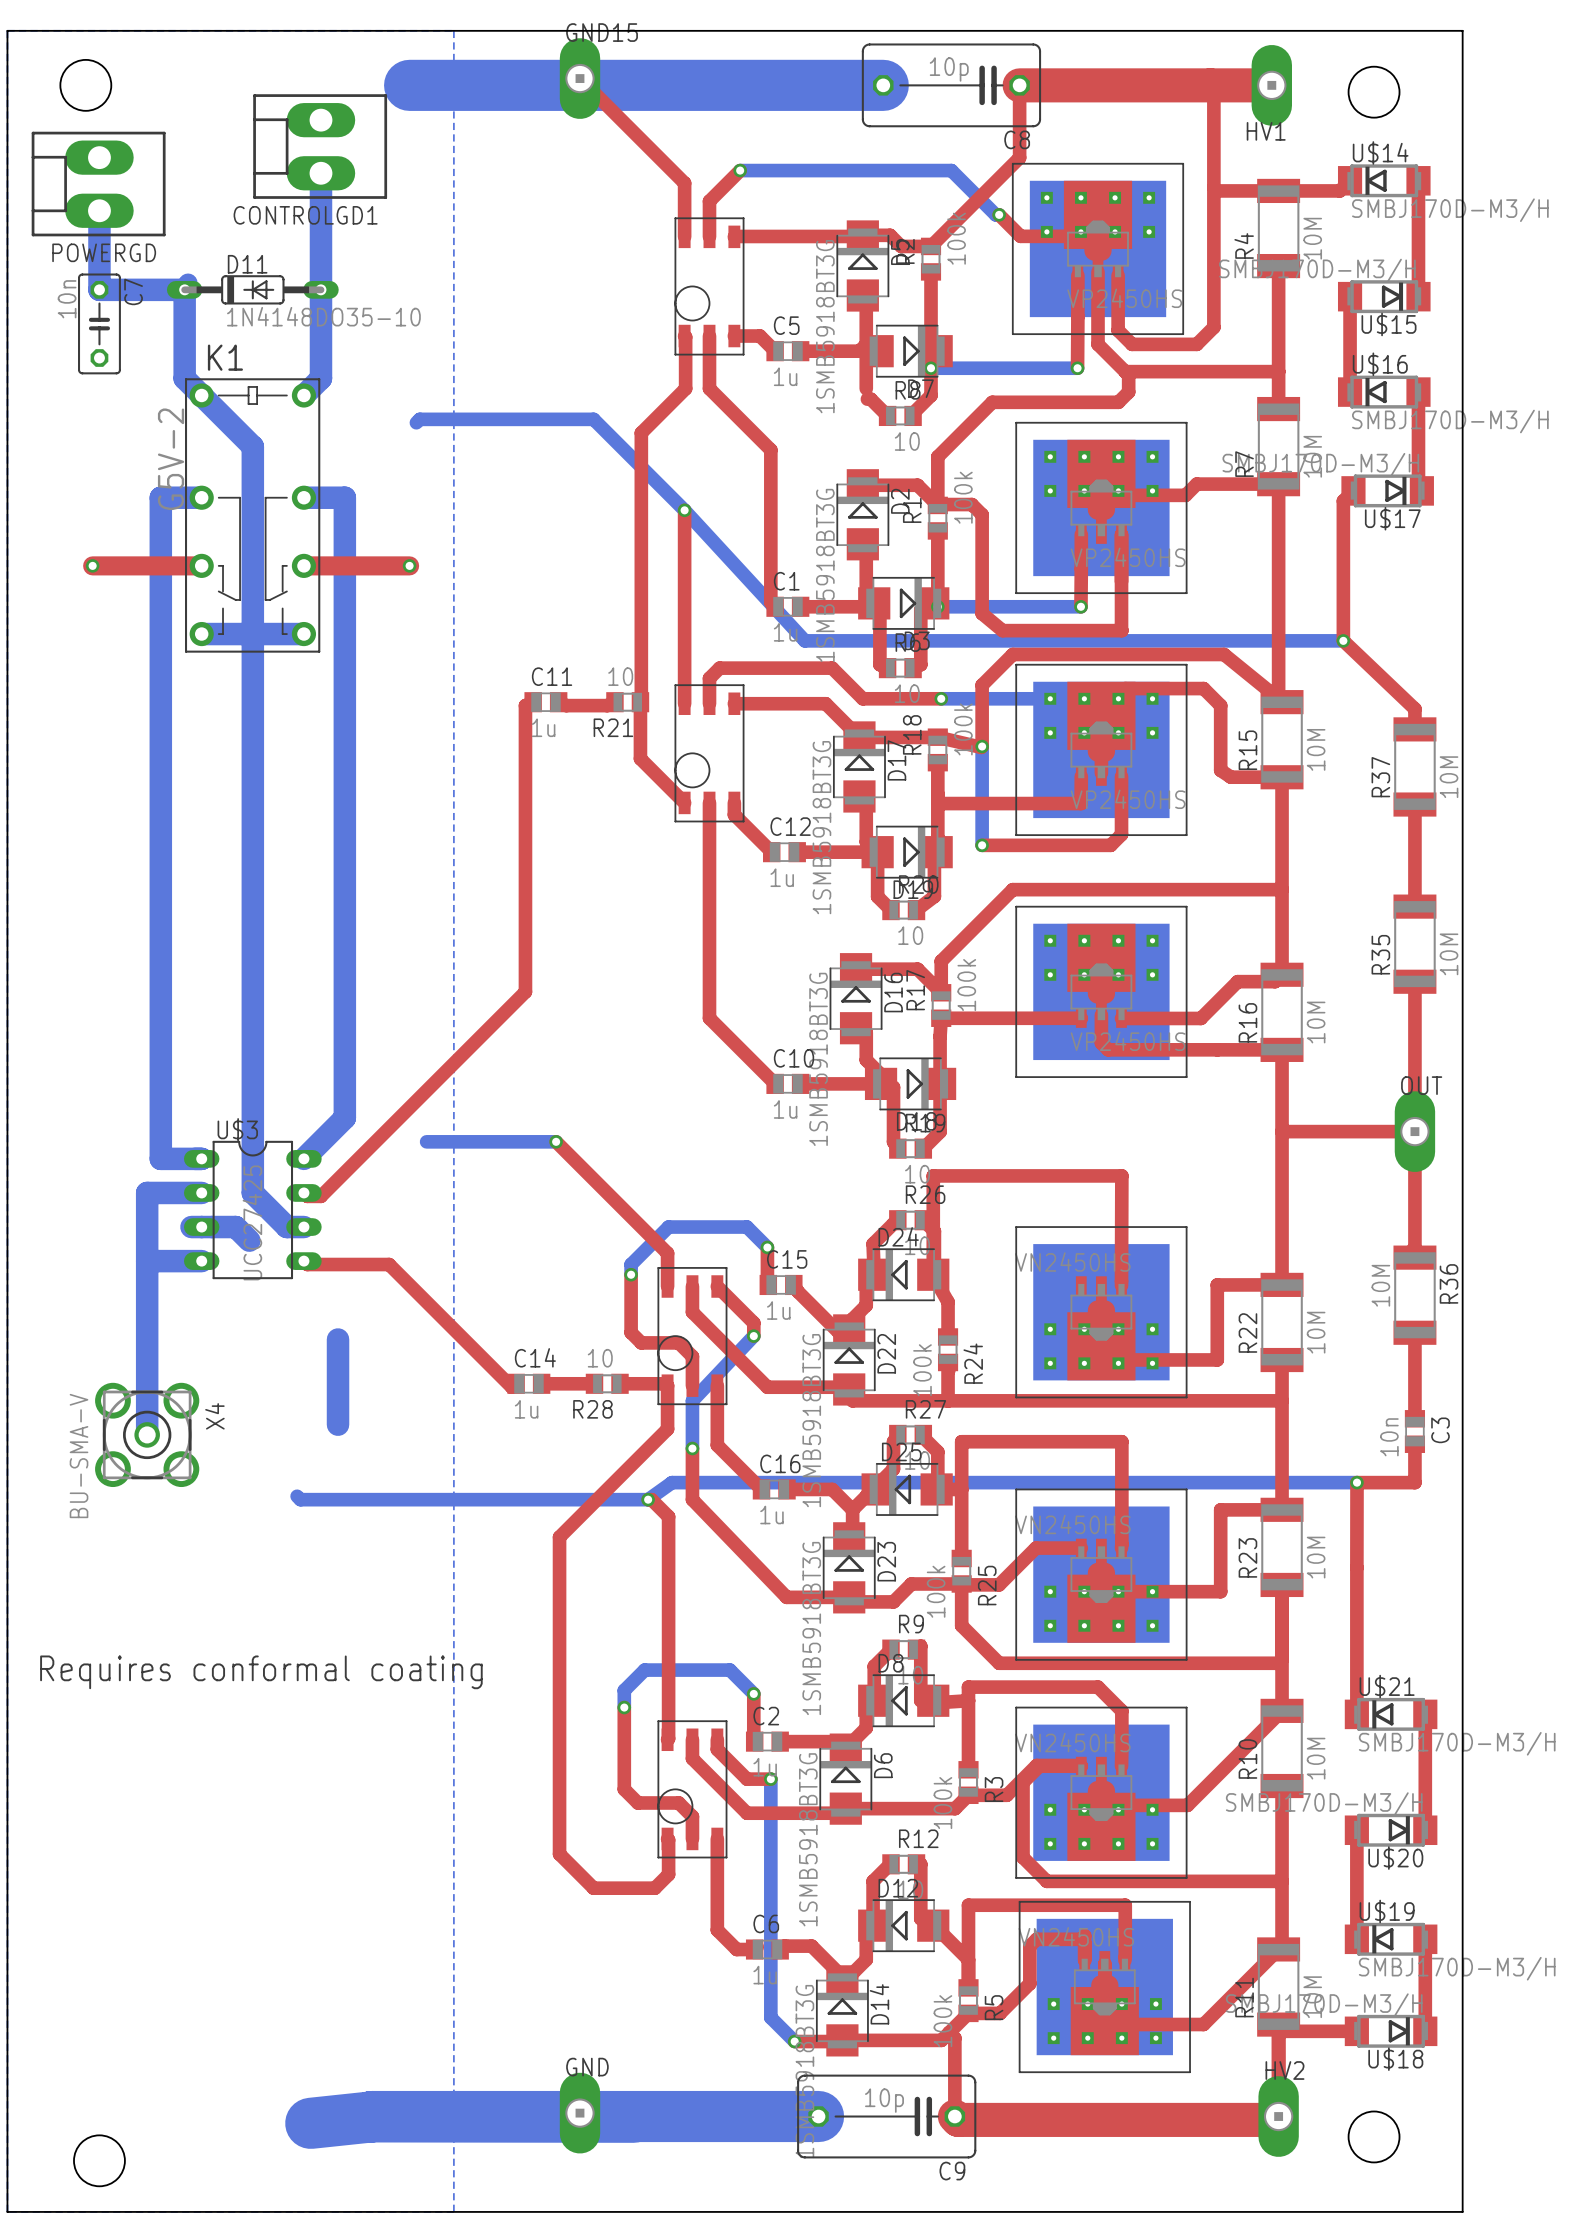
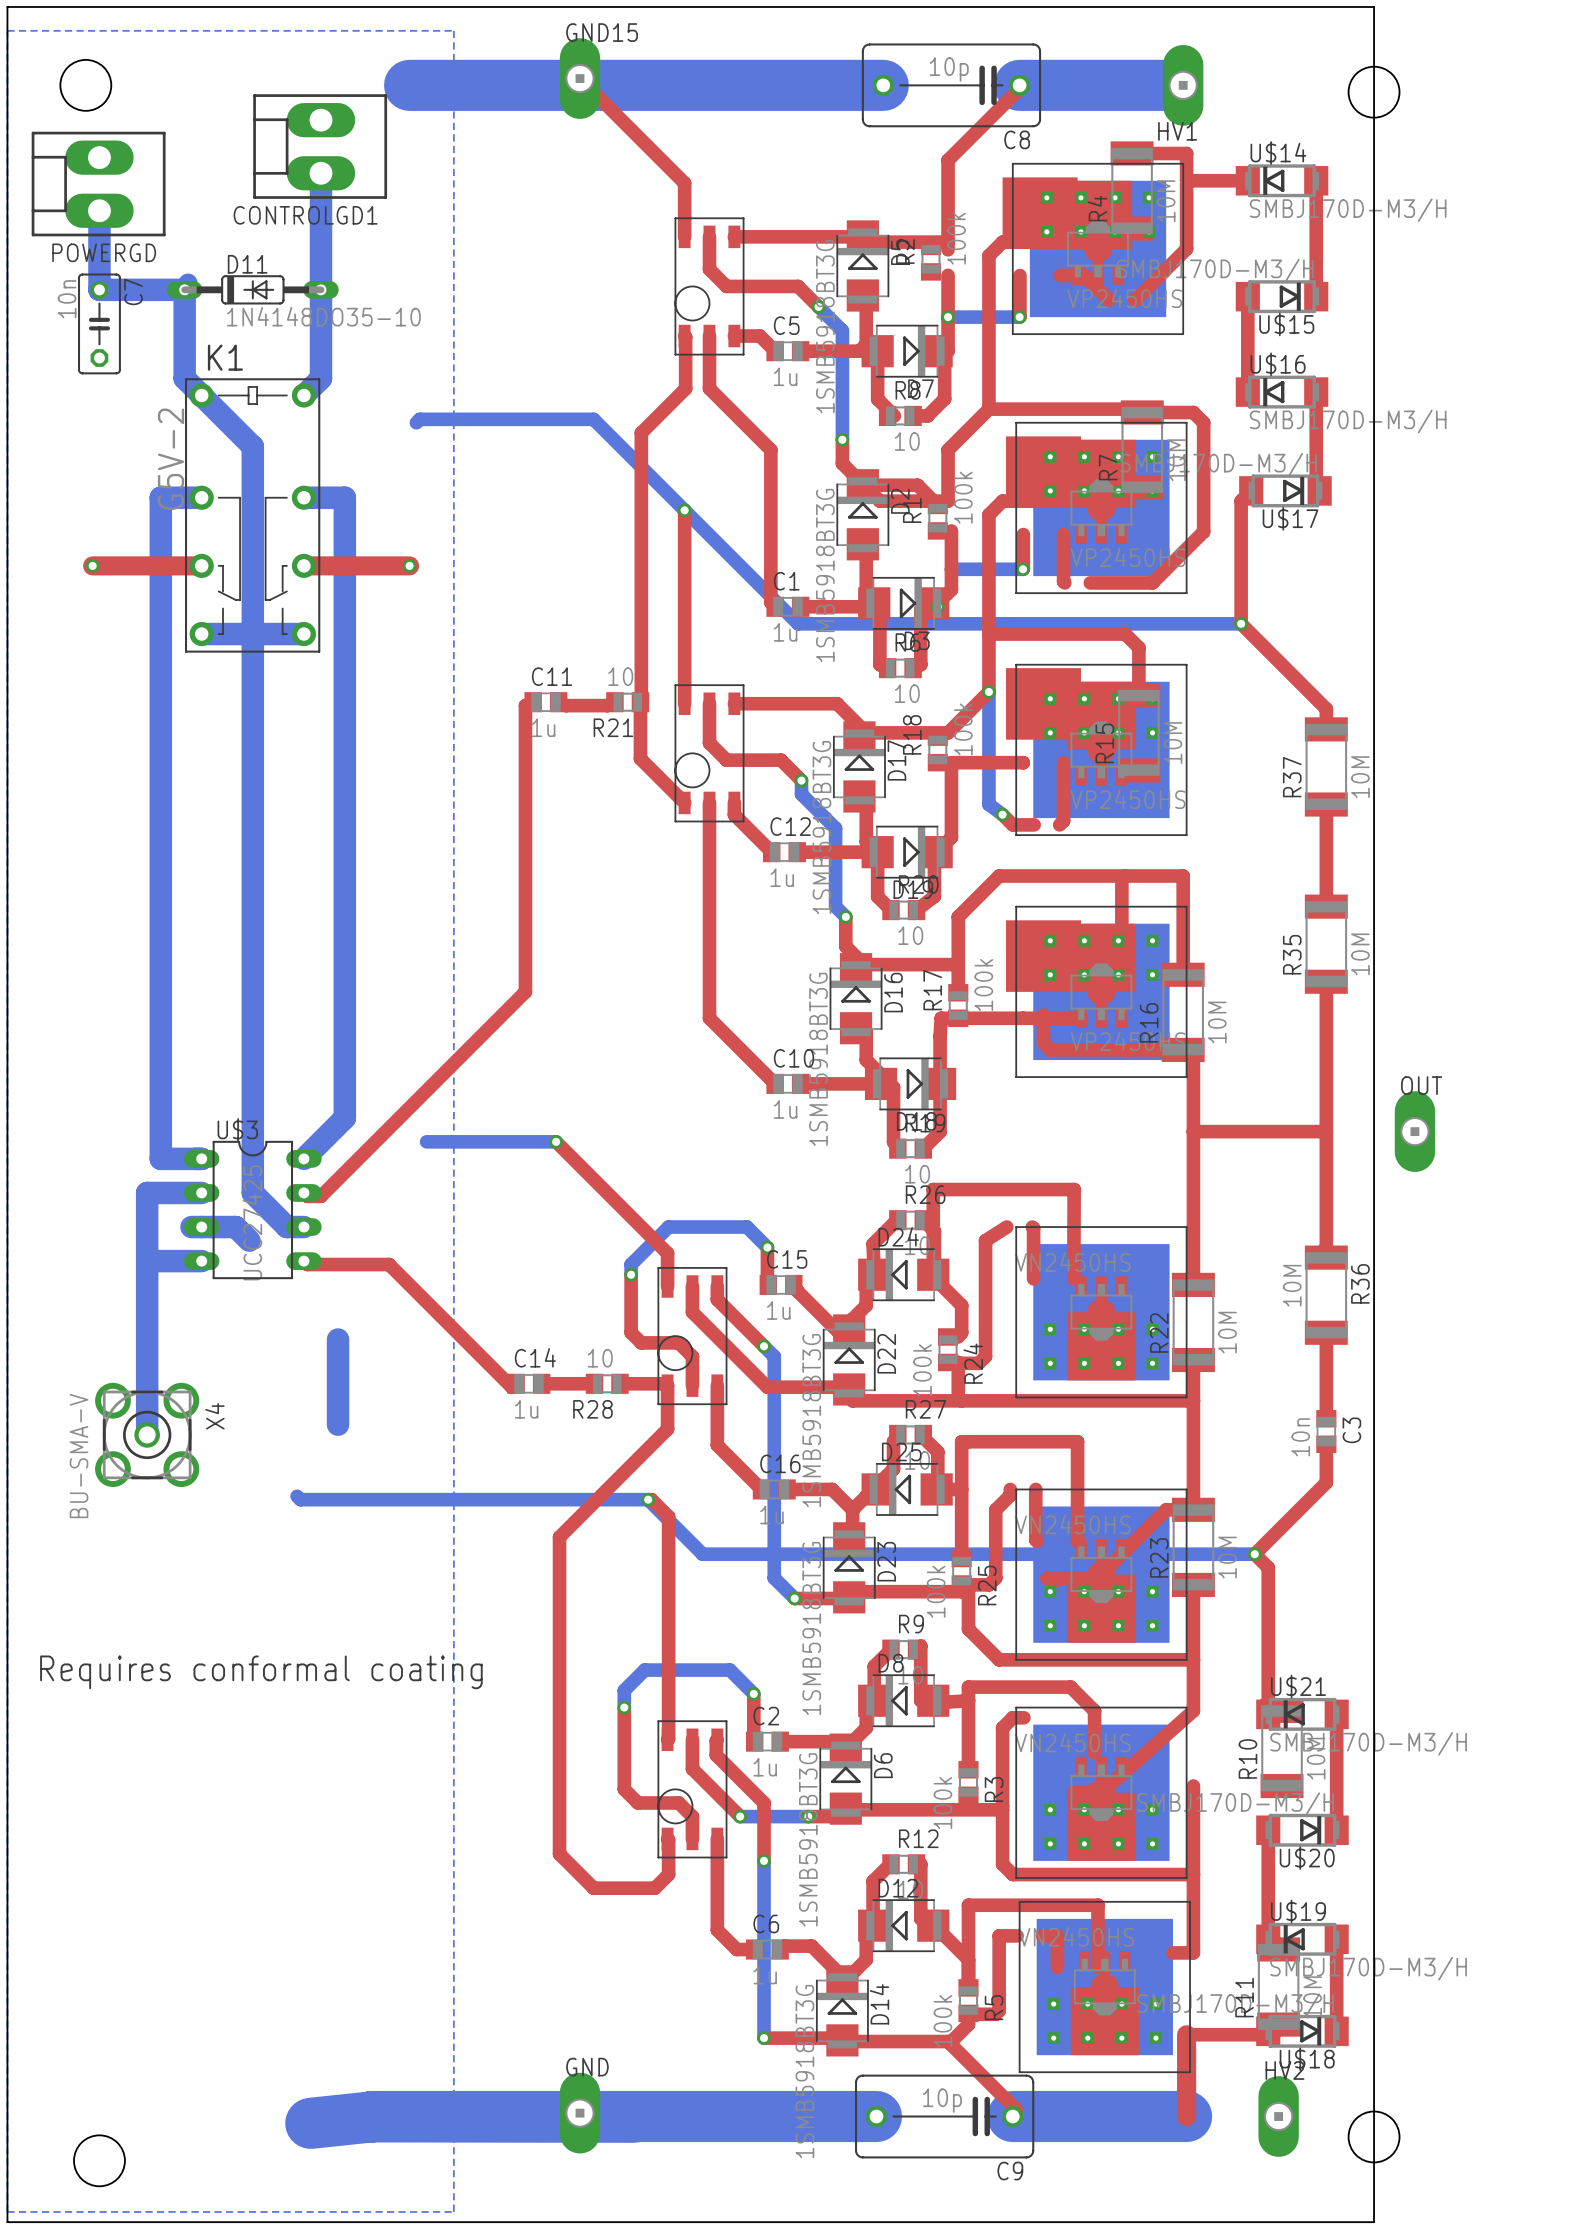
board edge: (7, 30) (1462, 30) (1462, 2211) (7, 2211) -> (7, 30) (7, 6) (1374, 6) (1374, 2222) (7, 2222) (7, 2211)
bottom track: none -> (1019, 85) (1176, 85) (1179, 78) (1183, 88)
top track: none -> (1019, 85) (1016, 92) (948, 160) (948, 249)
top track: (1210, 85) (1213, 88) (1213, 327) (1196, 344) (1132, 344) (1118, 330) (1118, 275) -> none
top track: (1271, 85) (1019, 85) (1019, 157) (931, 246) (901, 246) (890, 235) (734, 236) -> (948, 242) (866, 242) (862, 236) (734, 236)
HV1 position: (1271, 85) -> (1183, 85)
top track: none -> (1132, 153) (1186, 153) (1186, 180) (1247, 180)
bottom track: (740, 170) (951, 170) (995, 214) (999, 214) -> none
top track: (740, 170) (709, 201) (709, 236) -> (818, 306) (798, 286) (726, 286) (709, 269) (709, 236)
via: (740, 170) -> none
drawing: none -> [1002, 177, 1078, 249]
top track: none -> (1190, 180) (1186, 184) (1186, 248) (1134, 300)
top track: (1350, 180) (1339, 190) (1217, 190) (1213, 187) -> none
U$14 position: (1384, 180) -> (1282, 180)
top track: (1418, 180) (1418, 296) -> (1316, 180) (1316, 296)
top track: (999, 214) (1020, 236) (1098, 236) -> none
via: (999, 214) -> none
top track: none -> (1132, 228) (1138, 228) (1043, 228) (1040, 236) (1029, 242) (1002, 242) (988, 255) (988, 409)
R4 position: (1278, 228) -> (1132, 191)
top track: (1278, 266) (1278, 409) -> none
top track: (931, 271) (931, 395) (913, 413) (913, 415) -> none
top track: (1098, 272) (1098, 344) (1128, 375) (1128, 392) (1118, 402) (992, 402) (937, 456) (937, 505) (971, 504) (982, 514) (982, 613) (1002, 630) (1121, 630) (1121, 534) -> none
top track: none -> (948, 275) (948, 351) (944, 351) (944, 398) (927, 415) (919, 415)
top track: none -> (1019, 275) (1019, 317)
top track: none -> (1060, 275) (1084, 275) (1109, 300)
top track: (1077, 275) (1077, 368) -> none
top track: (1350, 296) (1350, 392) -> (1247, 296) (1247, 392)
U$15 position: (1384, 296) -> (1282, 296)
bottom track: none -> (818, 306) (842, 330) (842, 439)
via: none -> (818, 306)
bottom track: none -> (948, 317) (1019, 317)
via: none -> (948, 317)
via: none -> (1019, 317)
top track: (866, 351) (866, 388) -> none
top track: none -> (877, 351) (877, 399) (894, 415)
bottom track: (931, 368) (1077, 368) -> none
via: (931, 368) -> none
via: (1077, 368) -> none
top track: (1125, 371) (1278, 371) -> none
U$16 position: (1384, 392) -> (1282, 392)
top track: (1418, 392) (1418, 487) (1421, 490) -> (1316, 392) (1316, 487) (1319, 490)
top track: (867, 399) (870, 399) (887, 415) -> none
top track: none -> (988, 409) (948, 450) (948, 501) (879, 501) (842, 463) (842, 439)
top track: none -> (988, 409) (1138, 409) (1142, 412) (1193, 412) (1203, 422) (1203, 531) (1152, 582) (1090, 582)
drawing: none -> [1005, 436, 1081, 508]
via: none -> (842, 439)
R7 position: (1278, 446) -> (1142, 450)
top track: (1278, 484) (1196, 484) (1185, 495) (1101, 495) -> none
top track: (1278, 484) (1278, 698) -> none
top track: none -> (1251, 490) (1241, 501) (1241, 623) (1326, 709) (1326, 729) (1322, 732)
top track: (1353, 490) (1343, 501) (1343, 640) (1414, 709) (1414, 729) (1411, 732) -> none
U$17 position: (1387, 490) -> (1285, 490)
bottom track: (684, 510) (804, 640) (1343, 640) -> (684, 510) (798, 623) (1241, 623)
top track: (937, 530) (937, 606) -> none
top track: none -> (951, 530) (951, 589) (937, 603)
top track: none -> (1023, 534) (1023, 569)
top track: none -> (1063, 534) (1064, 582)
top track: (1081, 534) (1080, 606) -> none
bottom track: none -> (951, 569) (1023, 569)
via: none -> (1023, 569)
bottom track: (937, 606) (1080, 606) -> none
via: (1080, 606) -> none
via: none -> (1241, 623)
top track: none -> (988, 634) (1125, 634) (1138, 647) (1138, 695)
via: (1343, 640) -> none
drawing: none -> [1005, 668, 1081, 740]
bottom track: none -> (988, 691) (988, 804) (1002, 814)
via: none -> (988, 691)
bottom track: (941, 698) (1094, 698) (1101, 705) -> none
top track: (941, 698) (862, 698) (832, 668) (719, 668) (709, 678) (709, 703) -> (801, 780) (781, 760) (726, 760) (709, 743) (709, 703)
via: (941, 698) -> none
top track: (1278, 698) (1224, 654) (1012, 654) (982, 685) (981, 747) (937, 737) (859, 737) (825, 703) -> (1142, 487) (1043, 487) (1043, 501) (1002, 501) (988, 514) (988, 691) (948, 732) (866, 732) (837, 703) (825, 703)
R15 position: (1282, 739) -> (1138, 732)
bottom track: (982, 746) (982, 845) -> none
via: (982, 746) -> none
top track: (937, 762) (936, 852) -> (1023, 762) (951, 762) (951, 837) (936, 852)
top track: none -> (1063, 762) (1063, 820) (1059, 824)
R37 position: (1414, 766) -> (1326, 766)
top track: (1101, 773) (1101, 702) (1125, 688) (1203, 688) (1220, 705) (1220, 770) (1230, 777) (1281, 777) -> none
top track: (1081, 776) (1081, 803) (938, 803) (937, 794) -> none
top track: (1121, 776) (1121, 834) (1110, 845) (982, 845) -> none
top track: (1282, 777) (1282, 974) (1275, 981) (1237, 981) (1200, 1018) (1121, 1018) -> none
bottom track: none -> (801, 780) (801, 794) (835, 828) (835, 906) (845, 916)
via: none -> (801, 780)
top track: (1414, 804) (1414, 906) -> (1326, 804) (1326, 906)
top track: none -> (1002, 814) (1012, 824) (1034, 824)
via: none -> (1002, 814)
via: (982, 845) -> none
top track: none -> (1125, 876) (1121, 879) (1121, 951)
top track: (1282, 889) (1012, 889) (941, 961) (941, 992) (917, 969) (856, 969) -> (958, 964) (866, 964) (856, 969)
top track: none -> (845, 916) (845, 946) (864, 965)
via: none -> (845, 916)
drawing: none -> [1005, 920, 1081, 992]
R35 position: (1414, 944) -> (1326, 944)
top track: none -> (1183, 974) (1183, 876) (999, 876) (958, 916) (958, 992)
top track: (1414, 981) (1414, 1247) (1411, 1250) -> (1326, 981) (1326, 1247) (1322, 1250)
R17 position: (941, 1005) -> (958, 1005)
R16 position: (1282, 1012) -> (1183, 1012)
top track: (1101, 1015) (1101, 1043) (1108, 1049) -> (1043, 1015) (1043, 1043) (1050, 1049) (1108, 1049)
top track: (1128, 1049) (1282, 1049) -> (1128, 1049) (1193, 1049) (1193, 1284)
top track: (1282, 1049) (1282, 1284) -> none
top track: (1326, 1131) (1414, 1131) -> (1193, 1131) (1282, 1131)
top track: (933, 1189) (933, 1175) (1121, 1175) (1121, 1285) -> (933, 1189) (1074, 1189) (1073, 1278)
top track: none -> (1006, 1227) (985, 1240) (985, 1356) (978, 1363) (958, 1362) (958, 1397) (961, 1400)
top track: none -> (1032, 1227) (1033, 1278)
top track: (934, 1278) (948, 1302) (948, 1336) -> (934, 1278) (961, 1305) (961, 1332) (958, 1336)
top track: (1282, 1284) (1217, 1284) (1217, 1359) (1101, 1359) (1101, 1324) -> none
top track: (717, 1286) (753, 1322) (753, 1336) -> (717, 1286) (717, 1299) (764, 1346)
R36 position: (1414, 1295) -> (1326, 1295)
R22 position: (1282, 1322) -> (1193, 1322)
top track: (1414, 1332) (1414, 1418) -> (1326, 1332) (1326, 1418)
bottom track: (753, 1336) (692, 1400) (692, 1448) -> none
via position: (753, 1336) -> (764, 1346)
bottom track: none -> (764, 1346) (774, 1356) (774, 1578) (794, 1598)
top track: none -> (1193, 1360) (1193, 1509) (1166, 1509) (1098, 1578) (1046, 1578) (1057, 1580)
top track: (1282, 1360) (1282, 1509) (1220, 1509) (1220, 1591) (1101, 1591) (1101, 1587) -> none
top track: (948, 1370) (948, 1362) (948, 1400) -> none
top track: (1193, 1400) (1282, 1400) -> none
C3 position: (1414, 1431) -> (1326, 1431)
top track: (1077, 1441) (1121, 1441) (1121, 1548) -> (1077, 1441) (1077, 1541)
top track: none -> (1326, 1444) (1326, 1482) (1254, 1554) (1268, 1567) (1268, 1714)
top track: (1414, 1444) (1414, 1482) (1357, 1482) (1356, 1714) -> none
top track: (692, 1448) (692, 1499) (786, 1597) (849, 1597) (853, 1601) (893, 1601) (911, 1583) (961, 1583) (961, 1625) (999, 1663) (1278, 1663) (1282, 1659) -> none
via: (692, 1448) -> none
bottom track: (1357, 1482) (672, 1482) (648, 1499) -> (1254, 1554) (702, 1554) (648, 1499)
via: (1357, 1482) -> none
top track: none -> (1035, 1489) (1036, 1541)
R23 position: (1282, 1547) -> (1193, 1547)
top track: (1081, 1548) (1035, 1548) (999, 1584) (988, 1584) -> (1010, 1489) (1010, 1495) (995, 1509) (995, 1578) (988, 1584)
via: none -> (1254, 1554)
top track: none -> (1193, 1584) (1193, 1710) (1102, 1791) (1074, 1791)
top track: (1282, 1584) (1282, 1710) (1187, 1805) (1101, 1805) -> none
top track: none -> (794, 1598) (848, 1598) (852, 1591) (961, 1591) (968, 1583) (968, 1629) (999, 1659) (1193, 1659)
via: none -> (794, 1598)
top track: (1070, 1687) (1098, 1687) (1121, 1710) (1121, 1766) -> (1070, 1687) (1094, 1710) (1094, 1752)
U$21 position: (1391, 1714) -> (1302, 1714)
top track: (1425, 1714) (1425, 1830) -> (1336, 1714) (1336, 1830)
top track: none -> (1023, 1717) (1012, 1717) (1002, 1728) (1002, 1806) (999, 1809)
top track: (717, 1739) (717, 1749) (746, 1779) (770, 1779) -> (717, 1739) (716, 1755) (764, 1802) (764, 1860)
top track: (692, 1758) (746, 1813) (841, 1813) (845, 1808) (955, 1808) (968, 1795) (1006, 1795) (1036, 1765) (1080, 1765) (1039, 1766) (1023, 1782) (1023, 1857) (1046, 1881) (1282, 1881) -> (692, 1758) (692, 1768) (740, 1816)
bottom track: (770, 1779) (770, 2017) (794, 2041) -> none
via: (770, 1779) -> none
top track: none -> (1193, 1786) (1193, 1952) (1172, 1952)
top track: (1282, 1786) (1282, 1946) (1203, 2024) (1121, 2024) (1104, 2007) (1104, 1963) -> none
bottom track: none -> (740, 1816) (808, 1816)
via: none -> (740, 1816)
top track: none -> (808, 1816) (848, 1816) (845, 1808) (1002, 1809) (1002, 1864) (1012, 1874) (1193, 1874)
via: none -> (808, 1816)
top track: (1356, 1830) (1356, 1939) -> (1268, 1830) (1268, 1939)
U$20 position: (1391, 1830) -> (1302, 1830)
bottom track: none -> (764, 1860) (764, 2038)
via: none -> (764, 1860)
top track: (1098, 1905) (1125, 1905) (1124, 1960) -> (1098, 1905) (1097, 1967)
top track: none -> (1017, 1935) (999, 1935) (999, 2010) (995, 2014) (968, 2013) (968, 2024) (949, 2043)
top track: none -> (1042, 1935) (1057, 1935) (1057, 1967)
U$19 position: (1391, 1939) -> (1302, 1939)
top track: (1425, 1939) (1425, 2031) -> (1336, 1939) (1336, 2031)
top track: (1084, 1960) (1084, 1935) (1081, 1939) (1036, 1939) (1029, 1946) (1029, 1983) (1000, 2013) (968, 2013) (941, 2040) (794, 2041) -> none
top track: (1278, 2024) (1285, 2031) (1356, 2031) -> none
top track: (1278, 2024) (1278, 2119) (958, 2119) (954, 2116) (954, 2038) (949, 2032) -> none
top track: none -> (1268, 2031) (1268, 2034) (1186, 2034) (1186, 2116)
U$18 position: (1391, 2031) -> (1302, 2031)
top track: none -> (764, 2038) (846, 2038) (849, 2041)
top track: none -> (842, 2040) (948, 2041) (1016, 2109) (1012, 2116)
via position: (794, 2041) -> (764, 2038)
bottom track: none -> (818, 2116) (876, 2116)
C9 position: (886, 2116) -> (944, 2116)
bottom track: none -> (1012, 2116) (1186, 2116)

